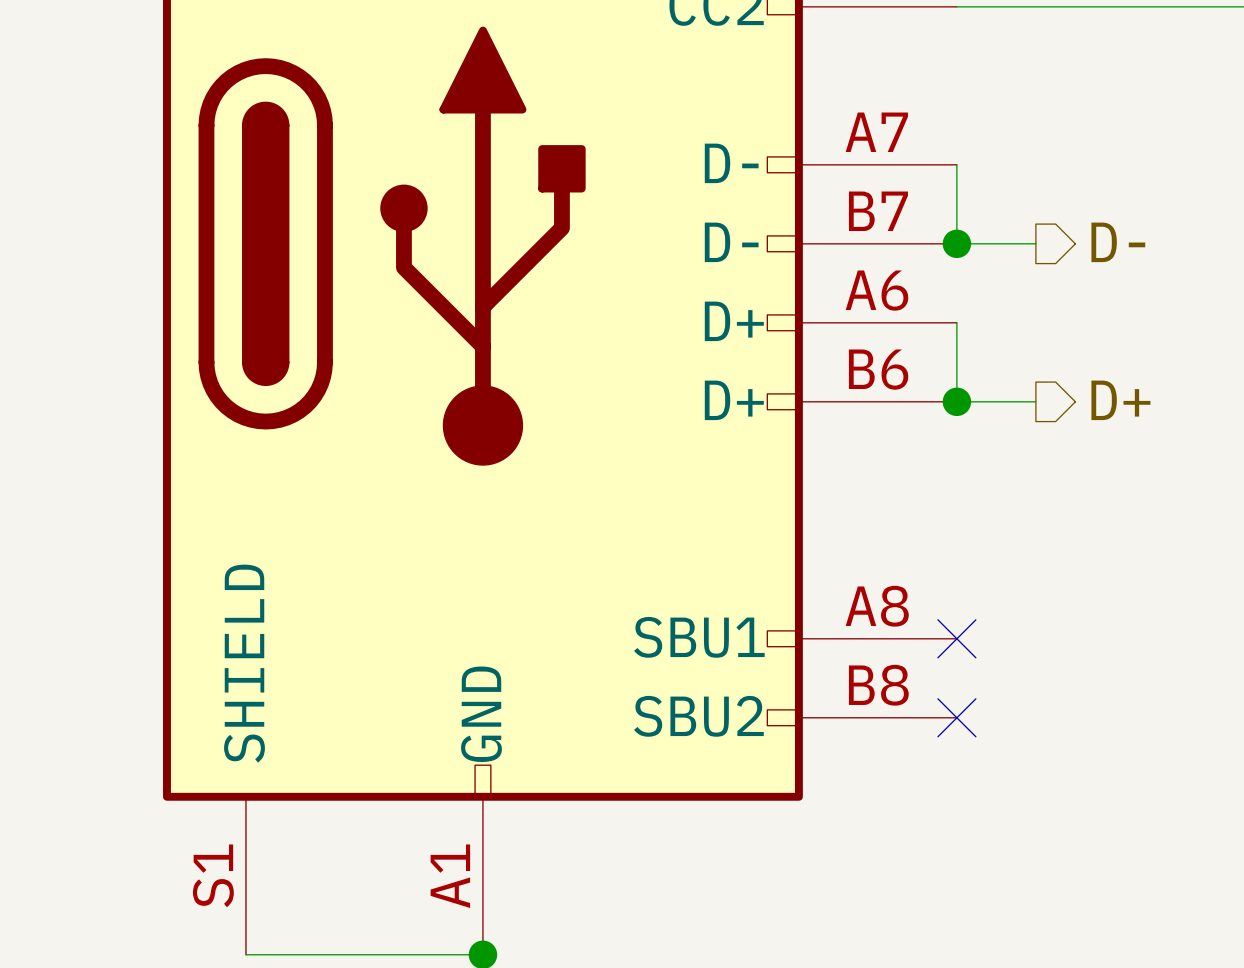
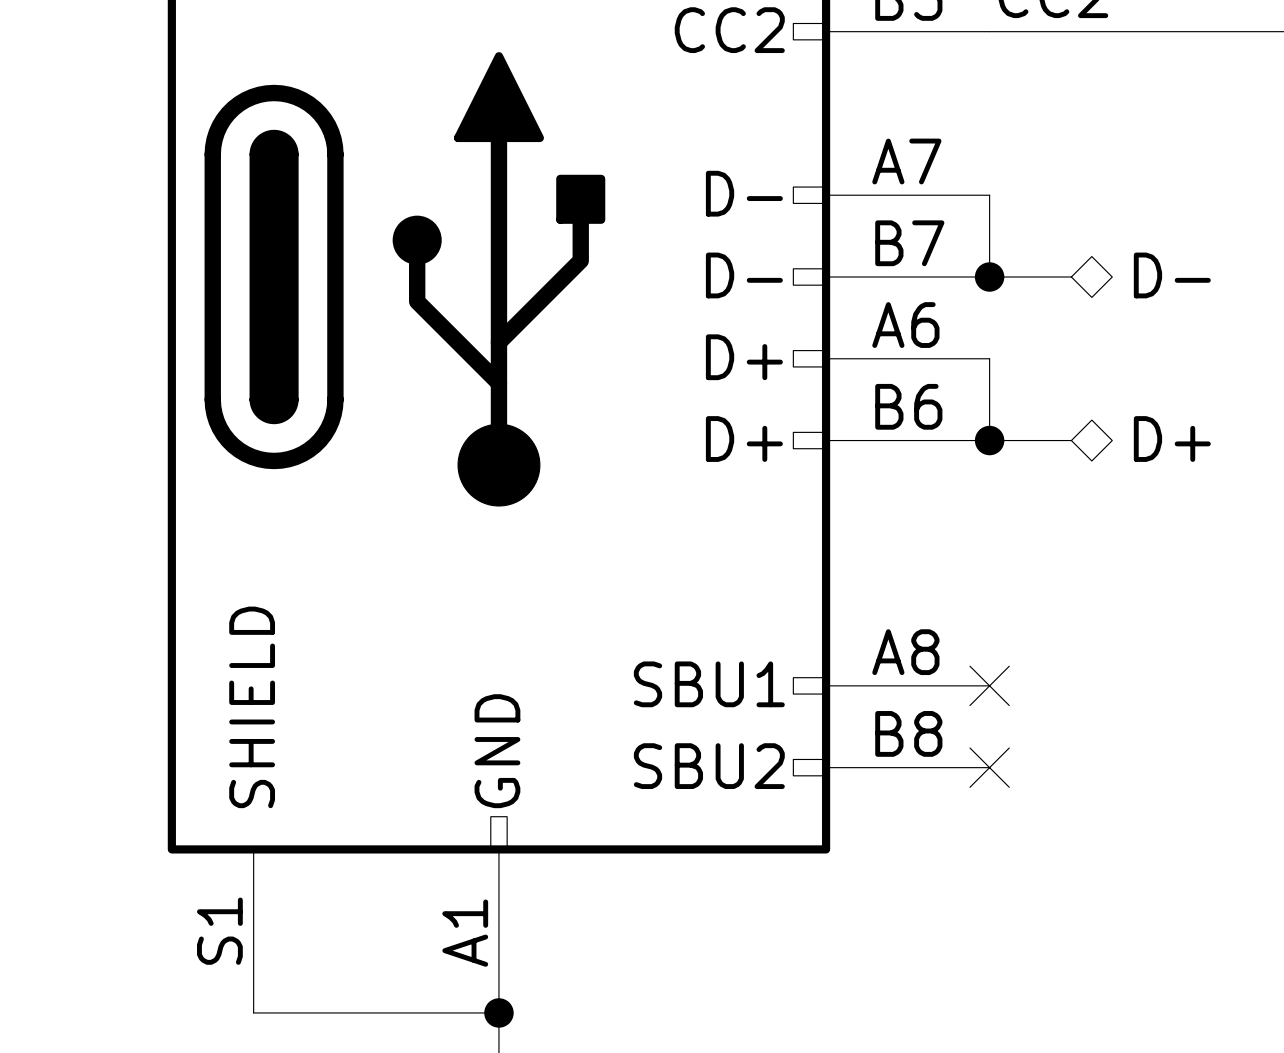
hierarchical label shape: output (1118, 242) -> bidirectional (1172, 275)
hierarchical label shape: output (1120, 400) -> bidirectional (1172, 439)

